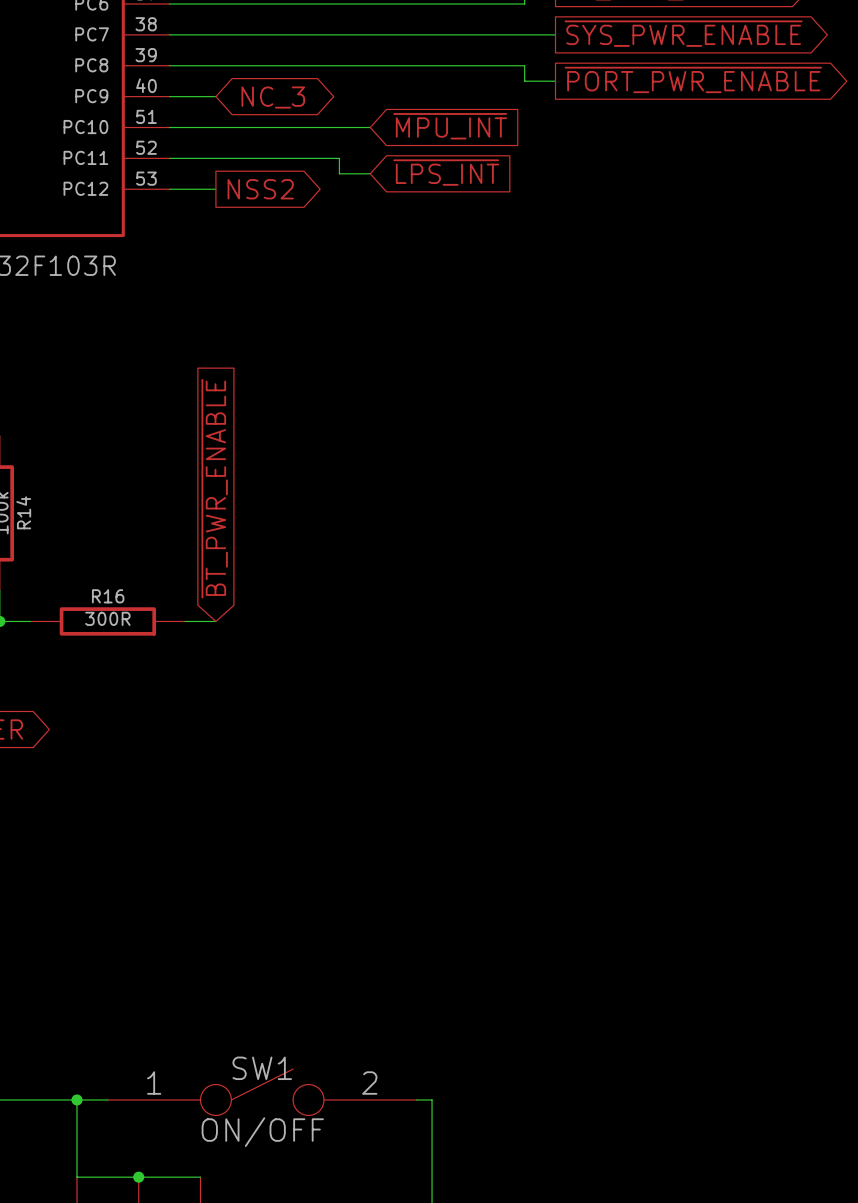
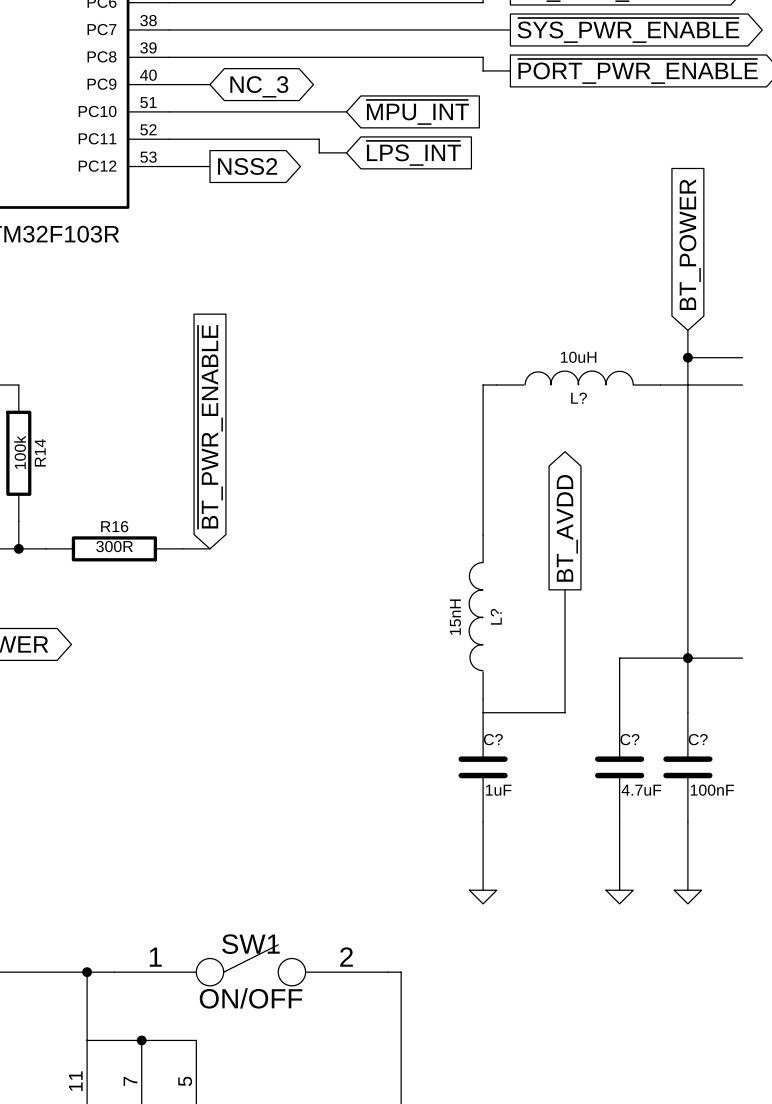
global label: none -> BT_POWER (690, 244)
wire: none -> (687, 330) (687, 712)
wire: none -> (687, 357) (742, 357)
junction: none -> (687, 357)
L?: none -> 10uH (578, 378)
wire: none -> (496, 385) (483, 385) (483, 535)
wire: none -> (660, 385) (742, 385)
global label: none -> BT_AVDD (567, 528)
wire: none -> (565, 589) (565, 712) (483, 712) (483, 699)
L?: none -> 15nH (476, 617)
junction: none -> (687, 658)
wire: none -> (742, 658) (619, 658) (619, 712)
C?: none -> 1uF (483, 767)
C?: none -> 4.7uF (619, 767)
C?: none -> 100nF (687, 767)
wire: none -> (483, 821) (483, 890)
wire: none -> (619, 821) (619, 890)
wire: none -> (687, 821) (687, 890)
power symbol: none -> (483, 897)
power symbol: none -> (619, 897)
power symbol: none -> (687, 897)

